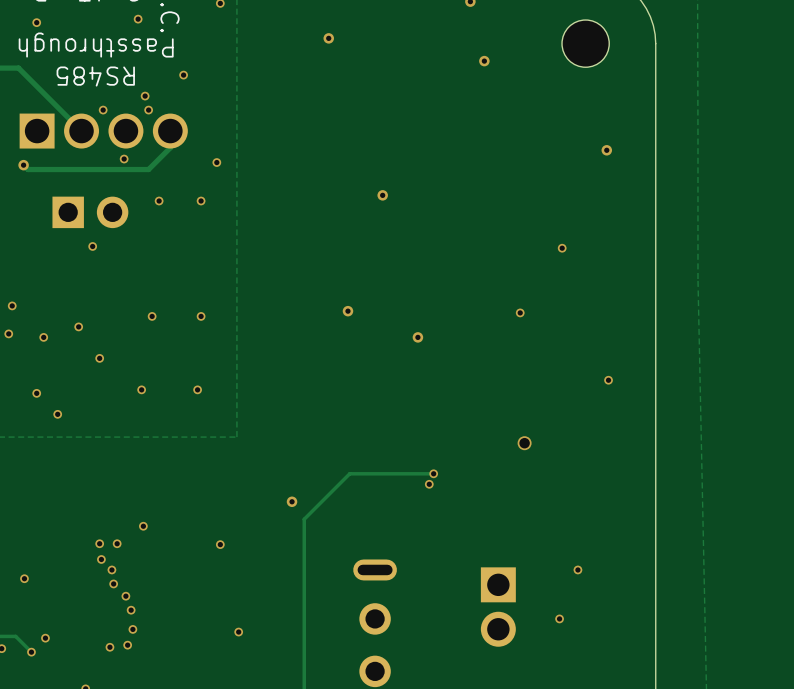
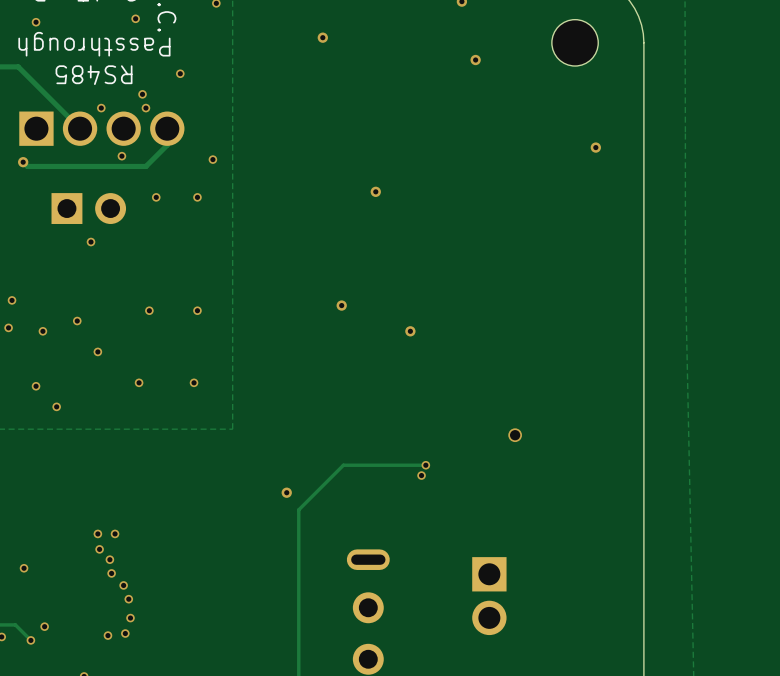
via: (562, 248) -> none
via: (520, 312) -> none
via: (608, 380) -> none
via: (143, 526) -> none
via: (220, 544) -> none
via: (577, 569) -> none
via: (559, 618) -> none
via: (238, 632) -> none

